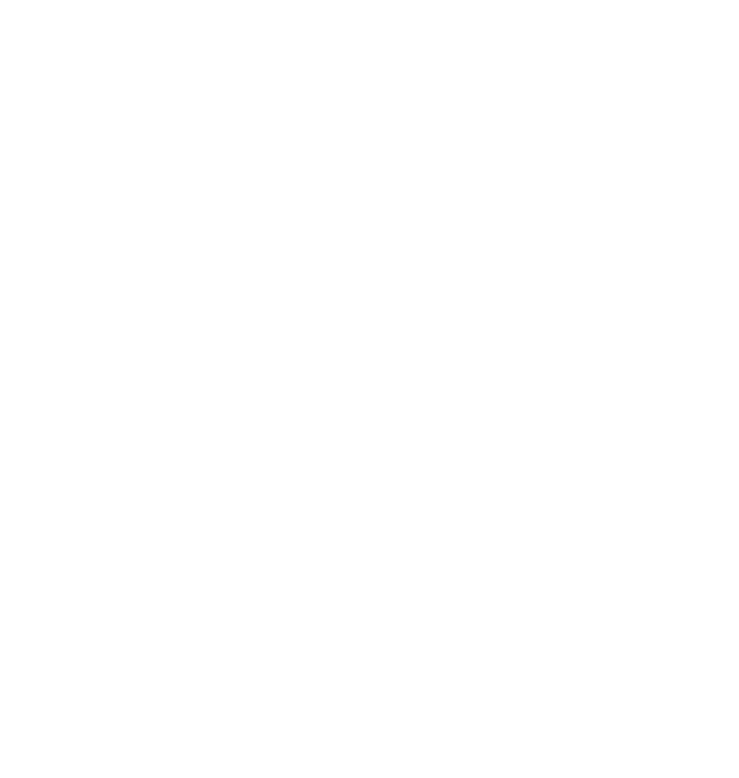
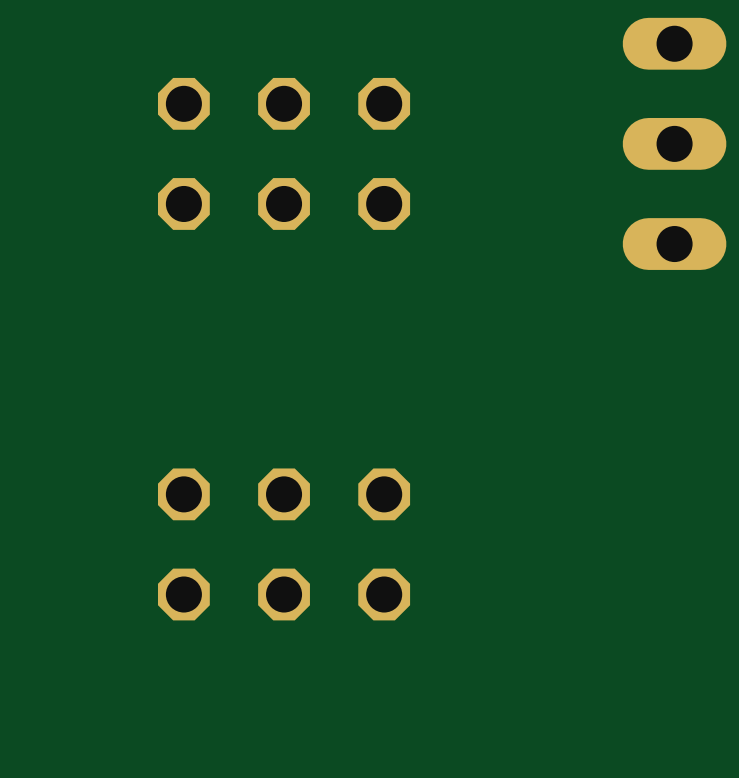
part: none -> (674, 143)
part: none -> (284, 153)
part: none -> (284, 544)

